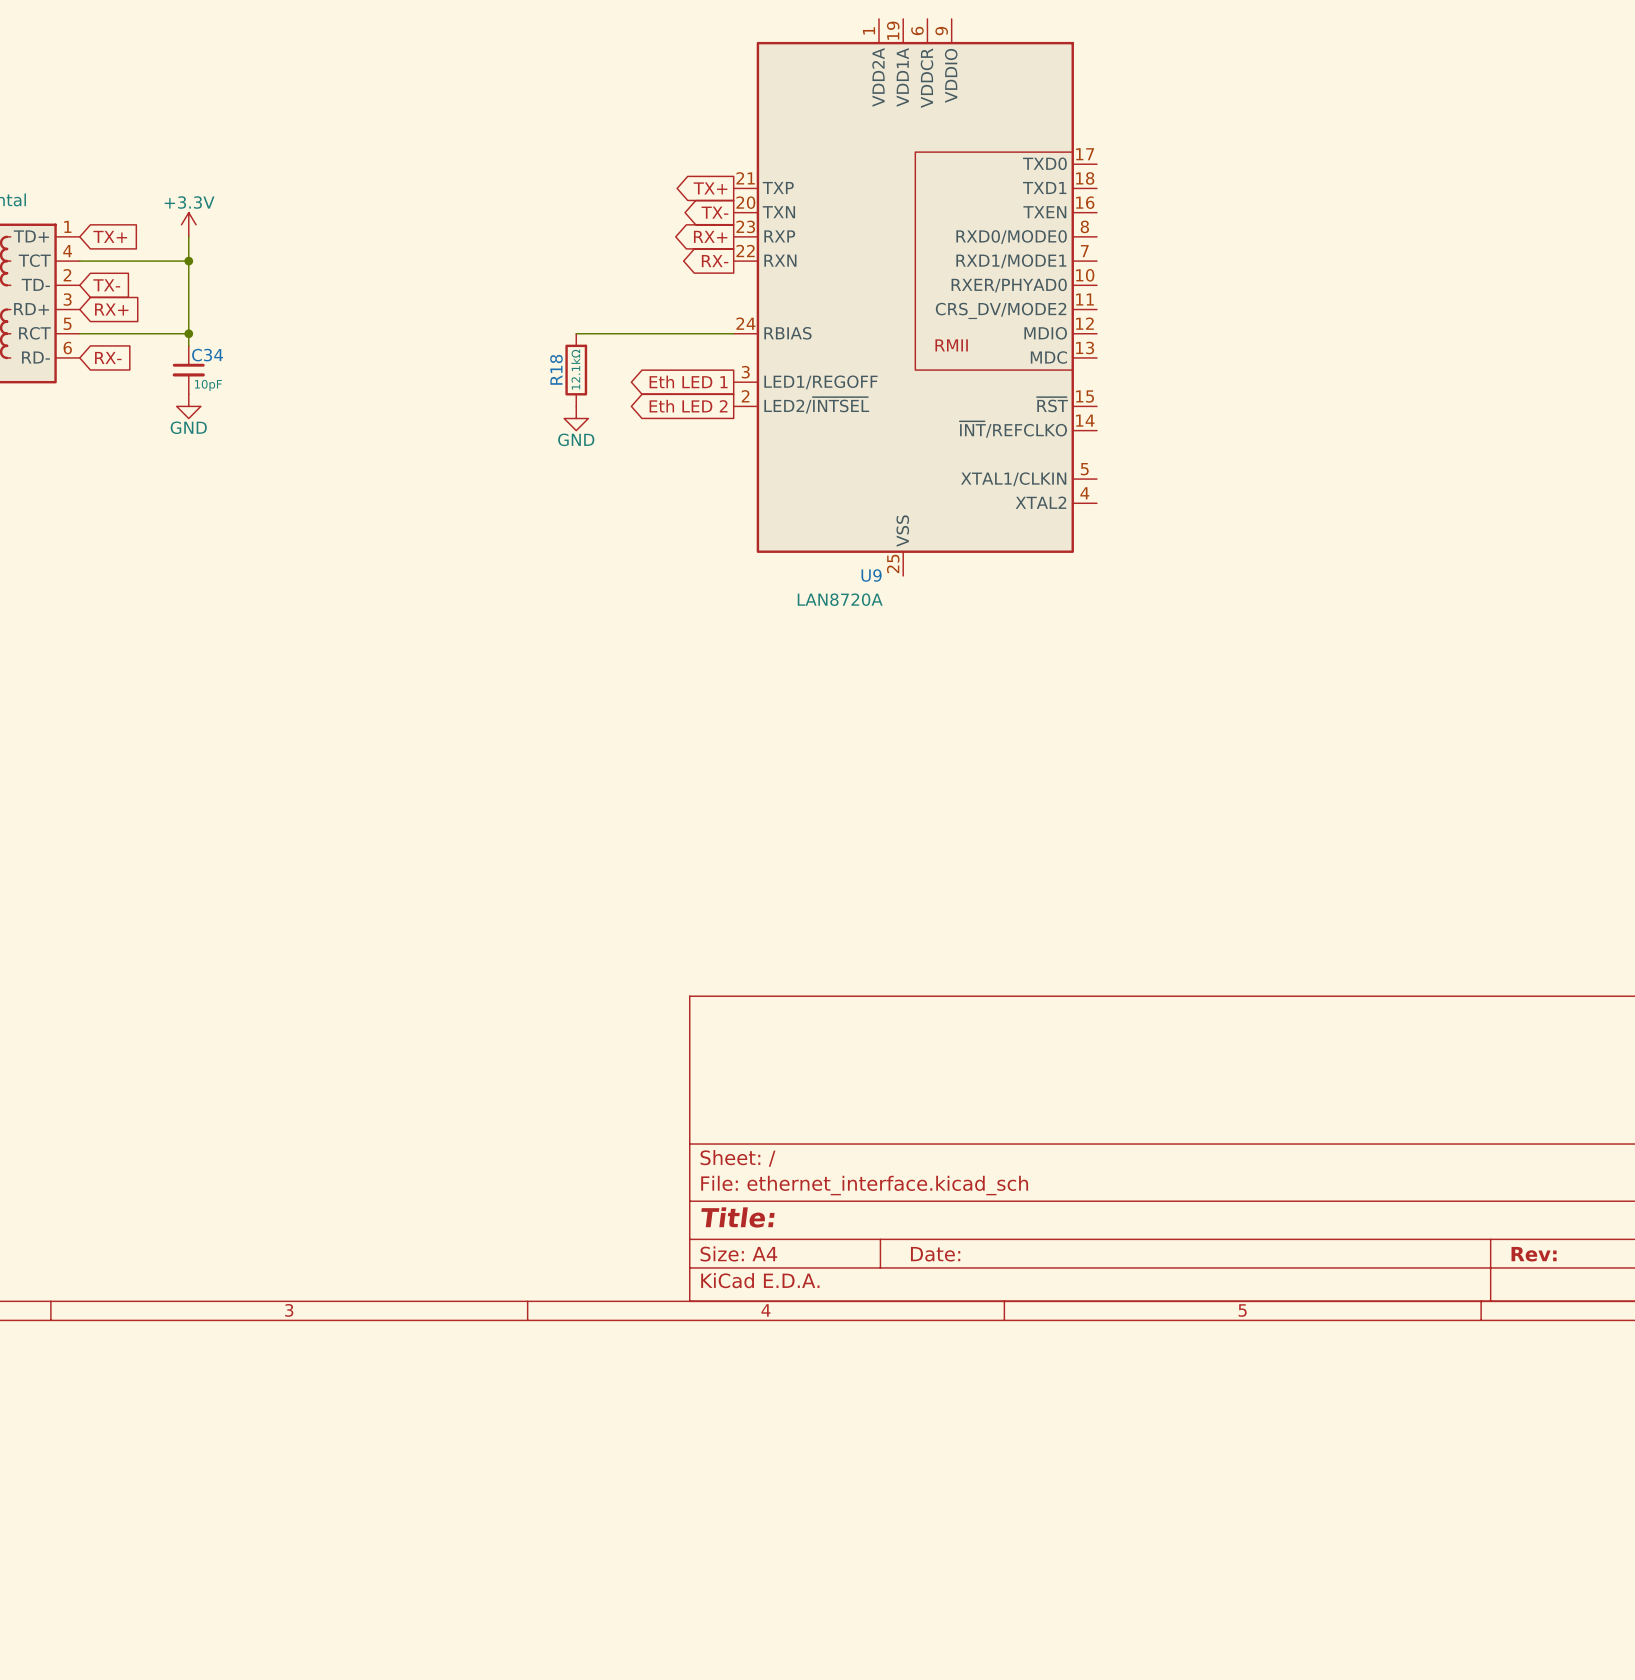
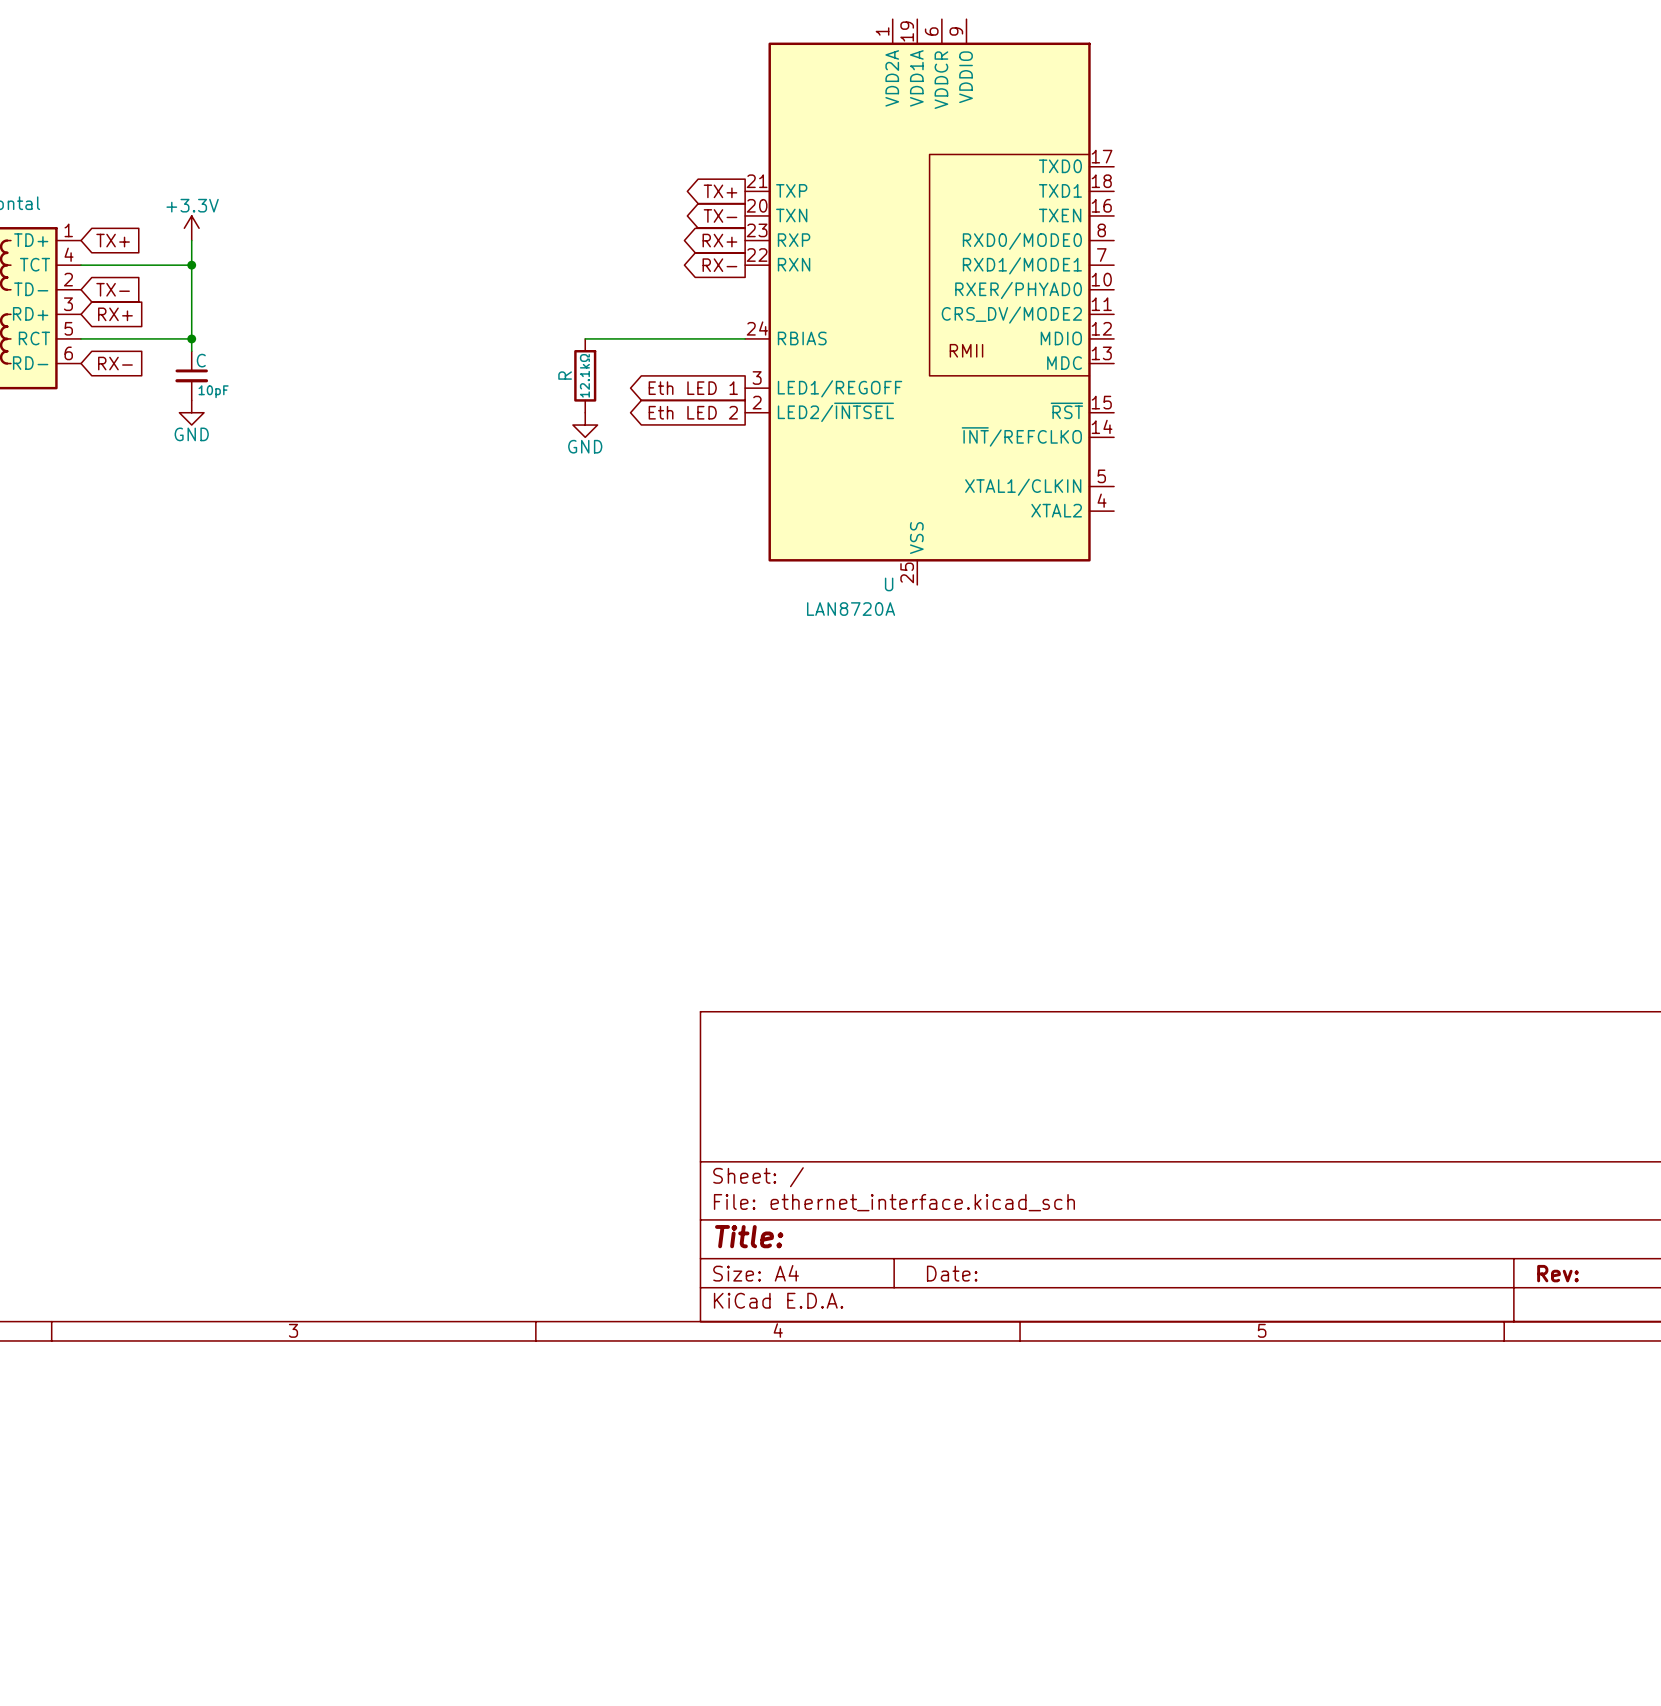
C34 name: C34 (207, 355) -> C (201, 360)
R18 name: R18 (556, 369) -> R (565, 375)
U9 name: U9 (871, 575) -> U (889, 584)

